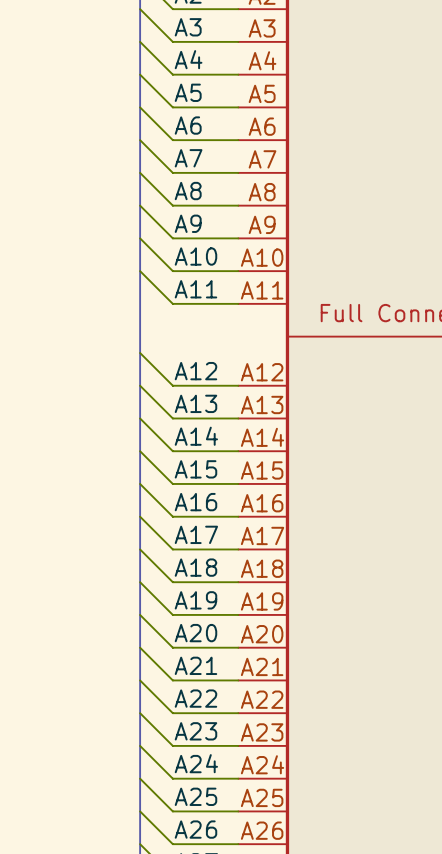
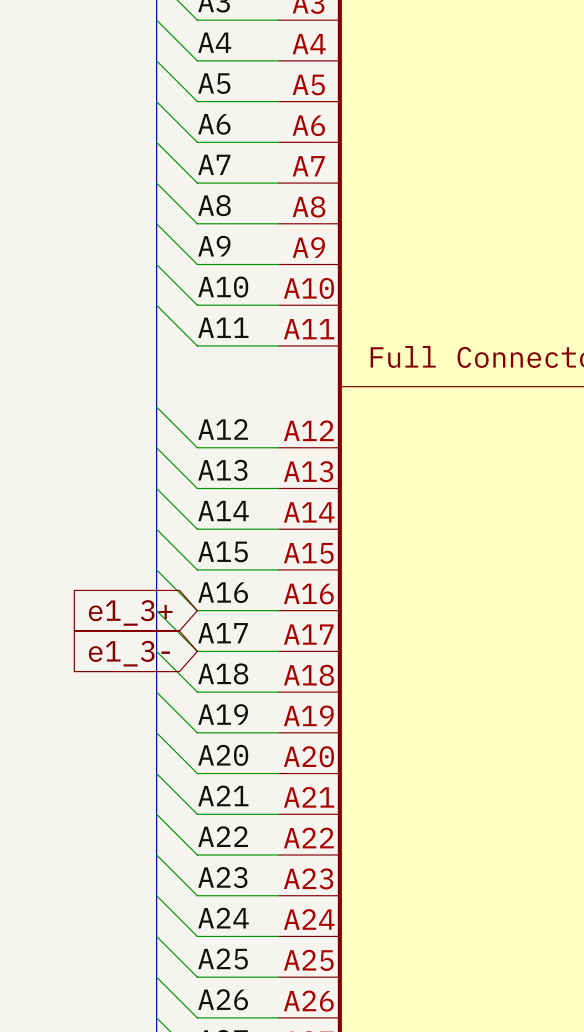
global label: none -> e1_3+ (130, 612)
global label: none -> e1_3- (129, 653)

